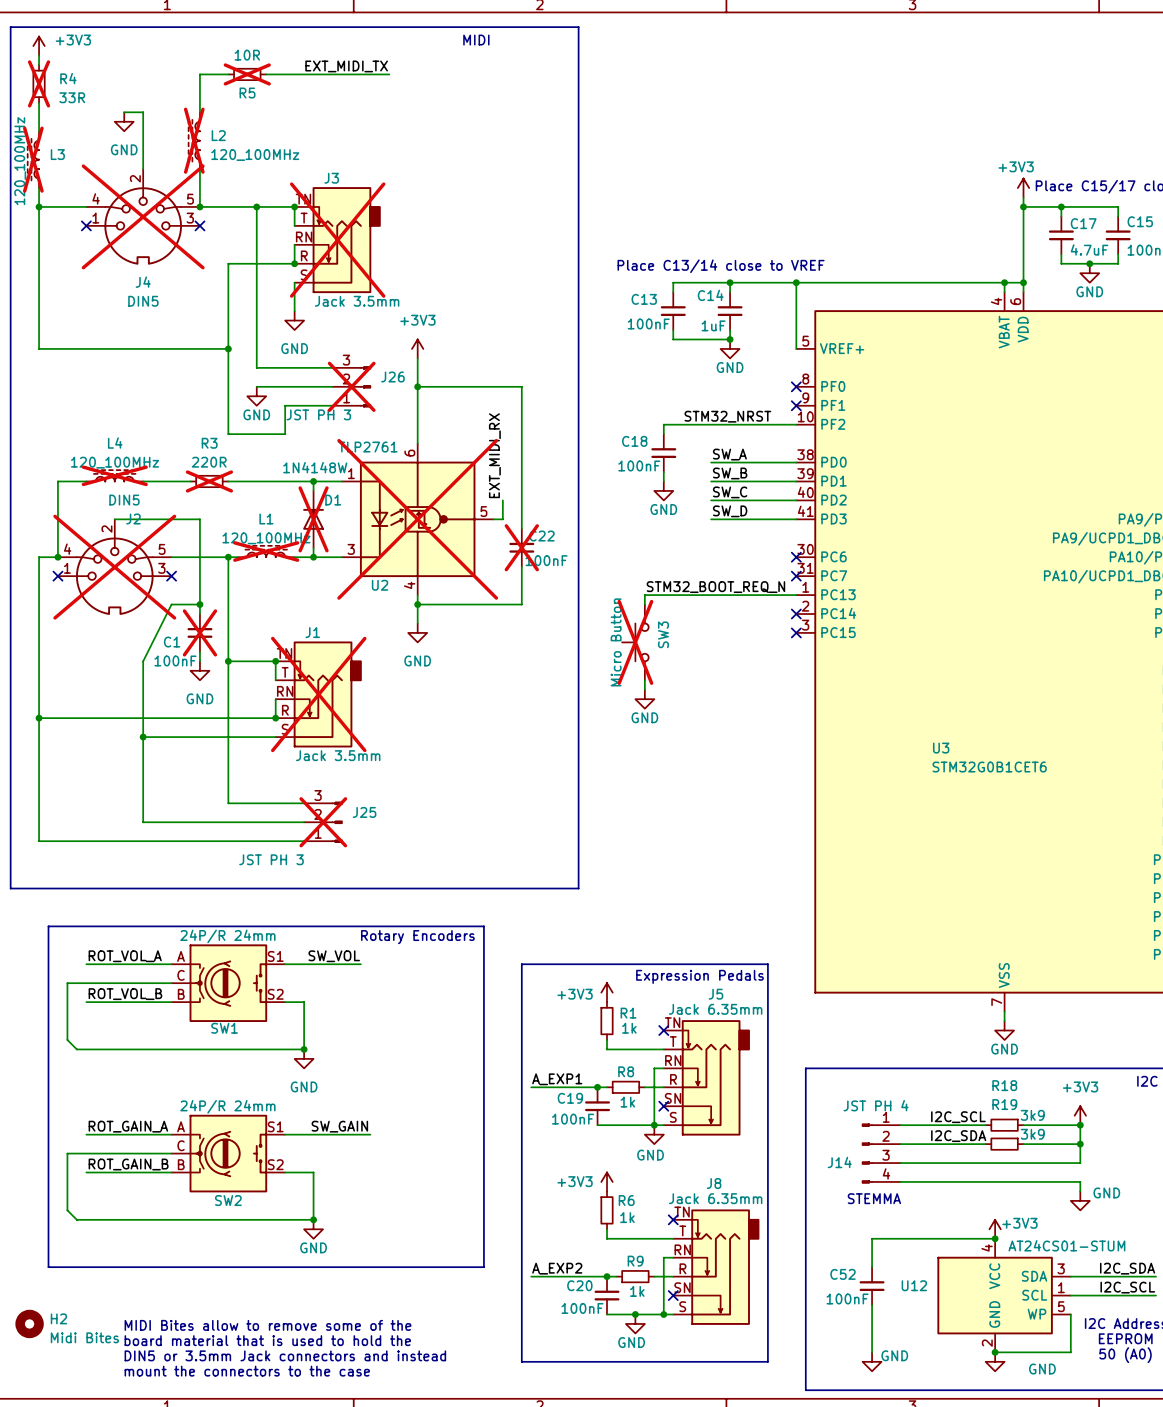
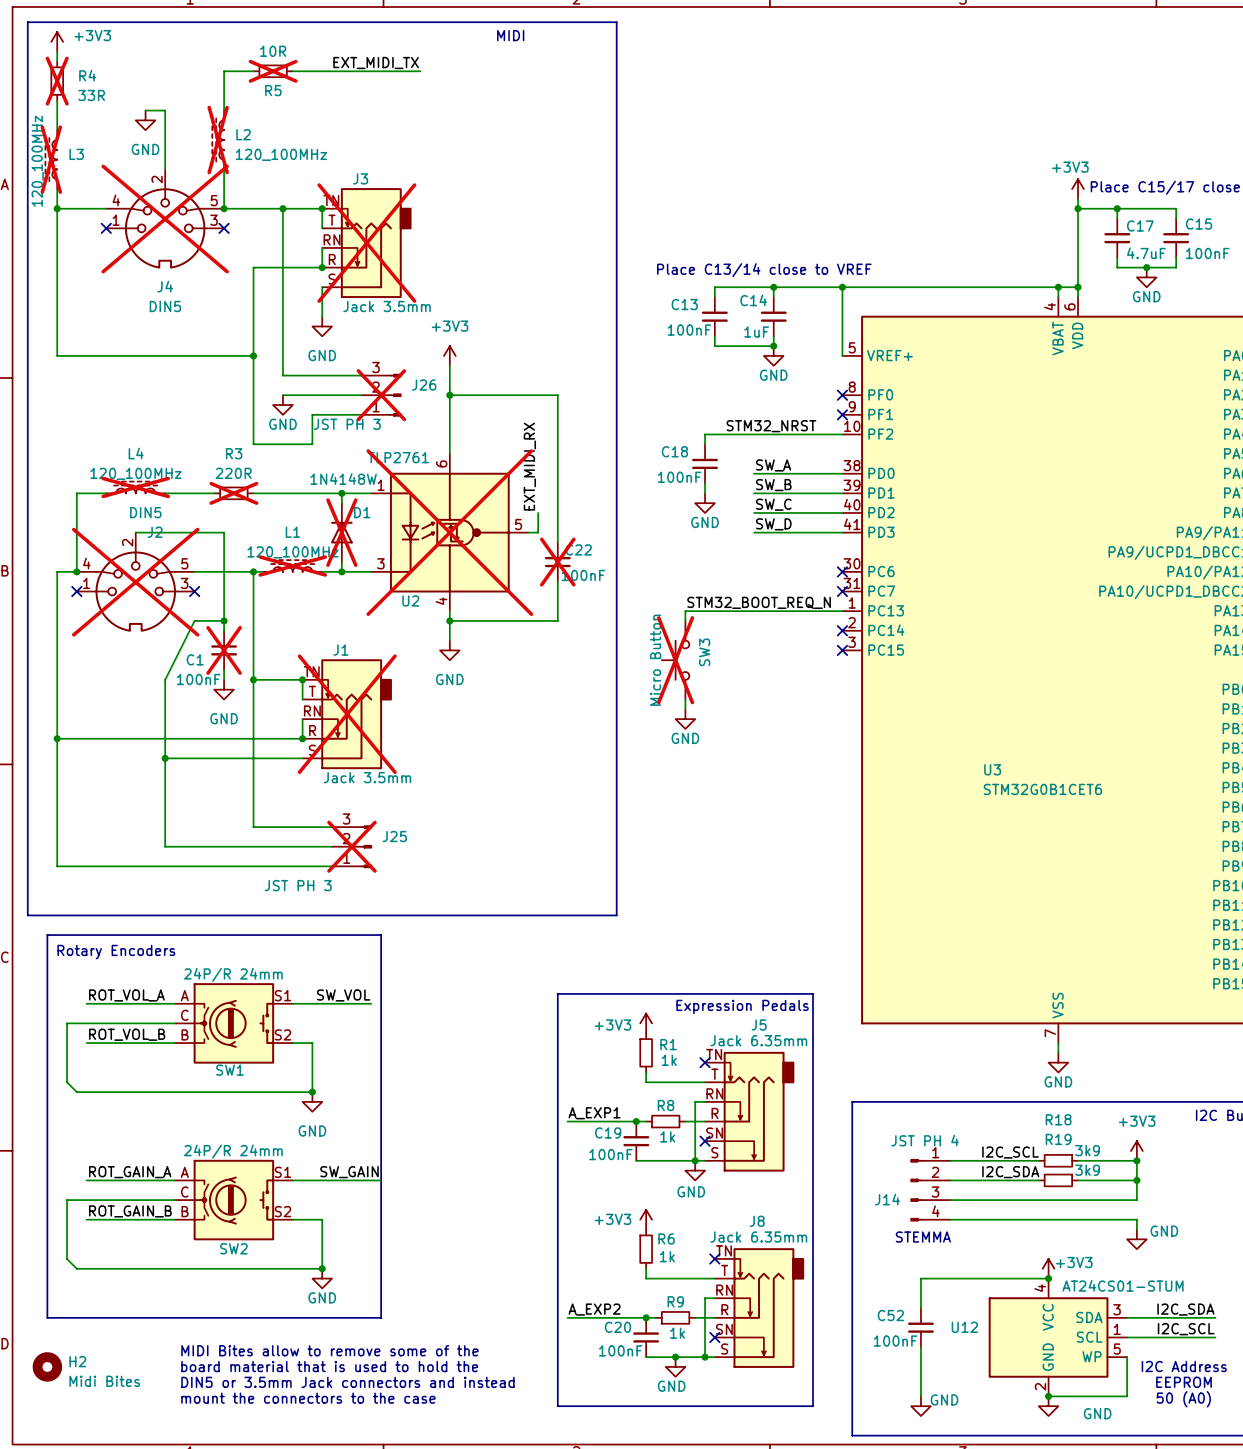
text: none -> Rotary Encoders (116, 952)
line: (48, 926) (483, 926) (483, 1267) (48, 1267) (48, 926) -> (47, 935) (47, 1317) (381, 1317) (381, 935) (47, 935)
text: Rotary Encoders (417, 937) -> none
label position: ROT_VOL_A (125, 956) -> ROT_VOL_A (126, 995)
label position: SW_VOL (334, 956) -> SW_VOL (343, 995)
wire: (86, 964) (171, 964) -> (86, 1003) (174, 1003)
wire: (285, 964) (360, 964) -> (292, 1003) (371, 1003)
wire: (171, 983) (67, 983) (67, 1039) (76, 1049) (304, 1049) (304, 1002) (285, 1002) -> (174, 1023) (67, 1023) (67, 1082) (76, 1092) (312, 1092) (312, 1043) (292, 1043)
SW1 position: (228, 983) -> (233, 1023)
label position: ROT_VOL_B (125, 994) -> ROT_VOL_B (127, 1034)
wire: (86, 1002) (171, 1002) -> (86, 1043) (174, 1043)
junction position: (304, 1049) -> (312, 1092)
power symbol position: GND (304, 1058) -> GND (312, 1101)
label position: ROT_GAIN_A (128, 1126) -> ROT_GAIN_A (130, 1172)
label position: SW_GAIN (339, 1126) -> SW_GAIN (349, 1172)
wire: (86, 1134) (171, 1134) -> (86, 1180) (174, 1180)
wire: (285, 1134) (370, 1134) -> (292, 1180) (381, 1180)
wire: (171, 1153) (67, 1153) (67, 1210) (76, 1219) (313, 1219) (313, 1172) (285, 1172) -> (174, 1200) (67, 1200) (67, 1258) (76, 1268) (322, 1268) (322, 1219) (292, 1219)
SW2 position: (228, 1153) -> (233, 1200)
label position: ROT_GAIN_B (128, 1164) -> ROT_GAIN_B (130, 1211)
wire: (86, 1172) (171, 1172) -> (86, 1219) (174, 1219)
junction position: (313, 1219) -> (322, 1268)
power symbol position: GND (313, 1229) -> GND (322, 1278)
text position: MIDI Bites allow to remove some of the (268, 1325) -> MIDI Bites allow to remove some of the (329, 1350)
text position: board material that is used to hold the (267, 1340) -> board material that is used to hold the (329, 1366)
text position: DIN5 or 3.5mm Jack connectors and instead (285, 1355) -> DIN5 or 3.5mm Jack connectors and instead (347, 1382)
text position: mount the connectors to the case (247, 1371) -> mount the connectors to the case (308, 1398)

